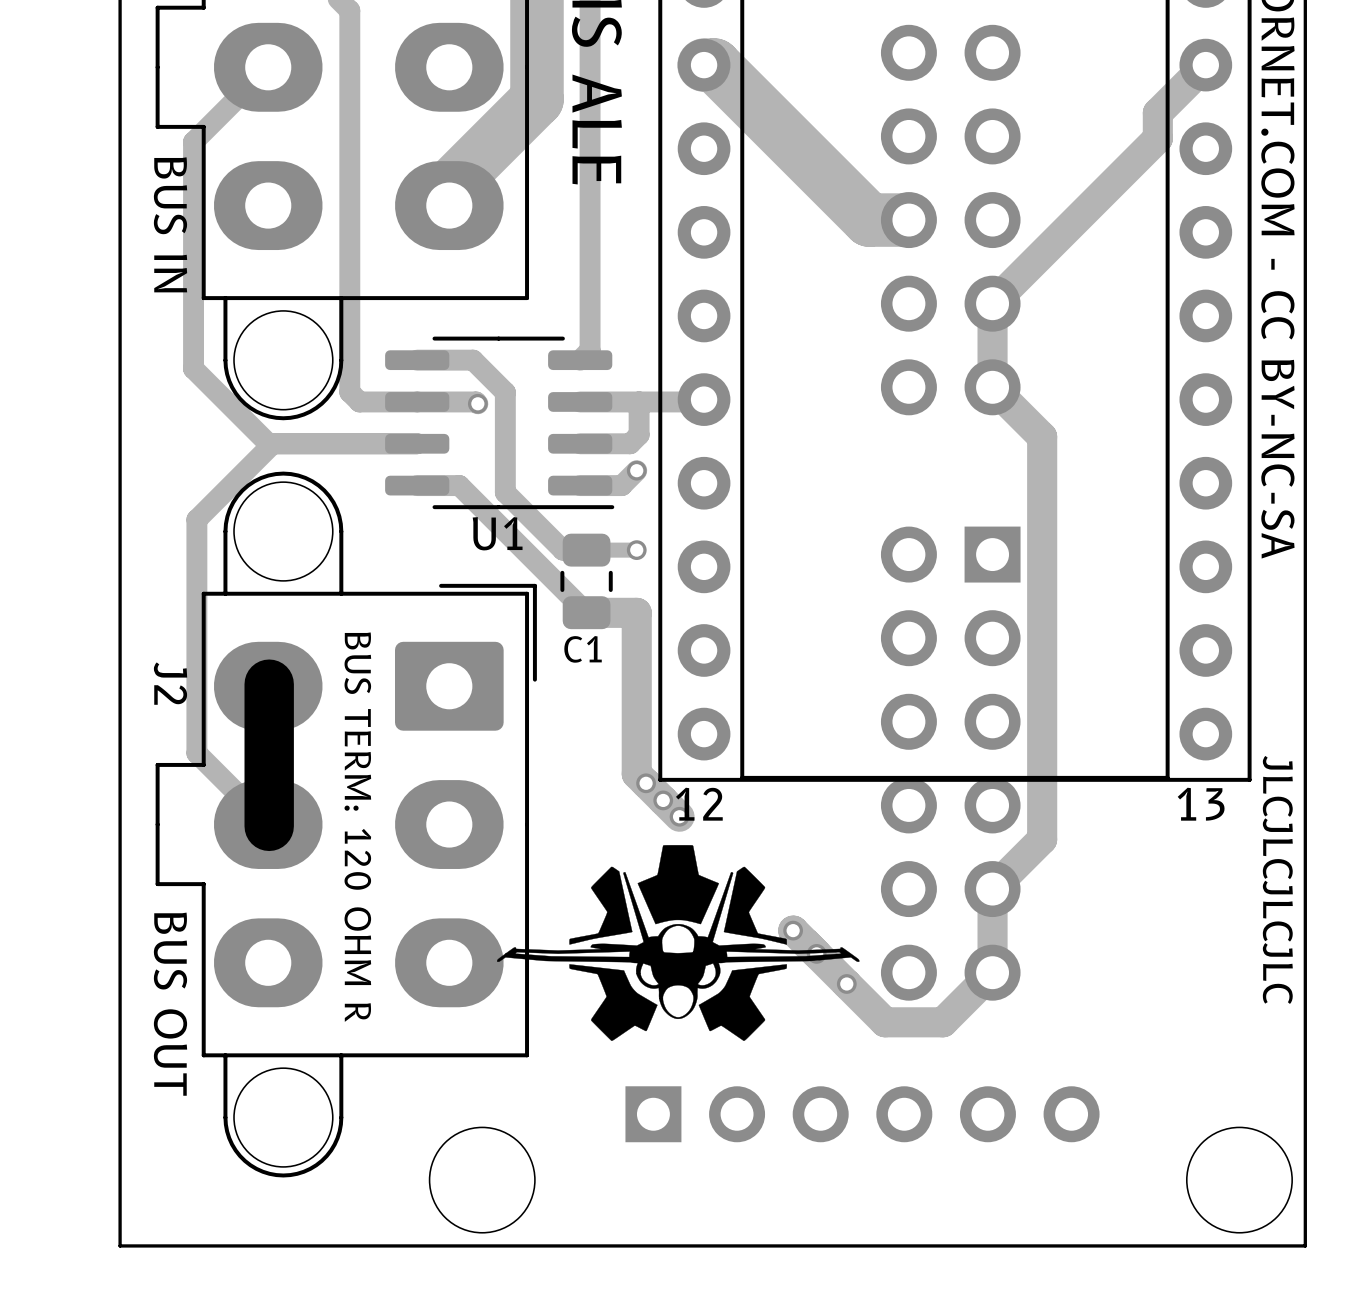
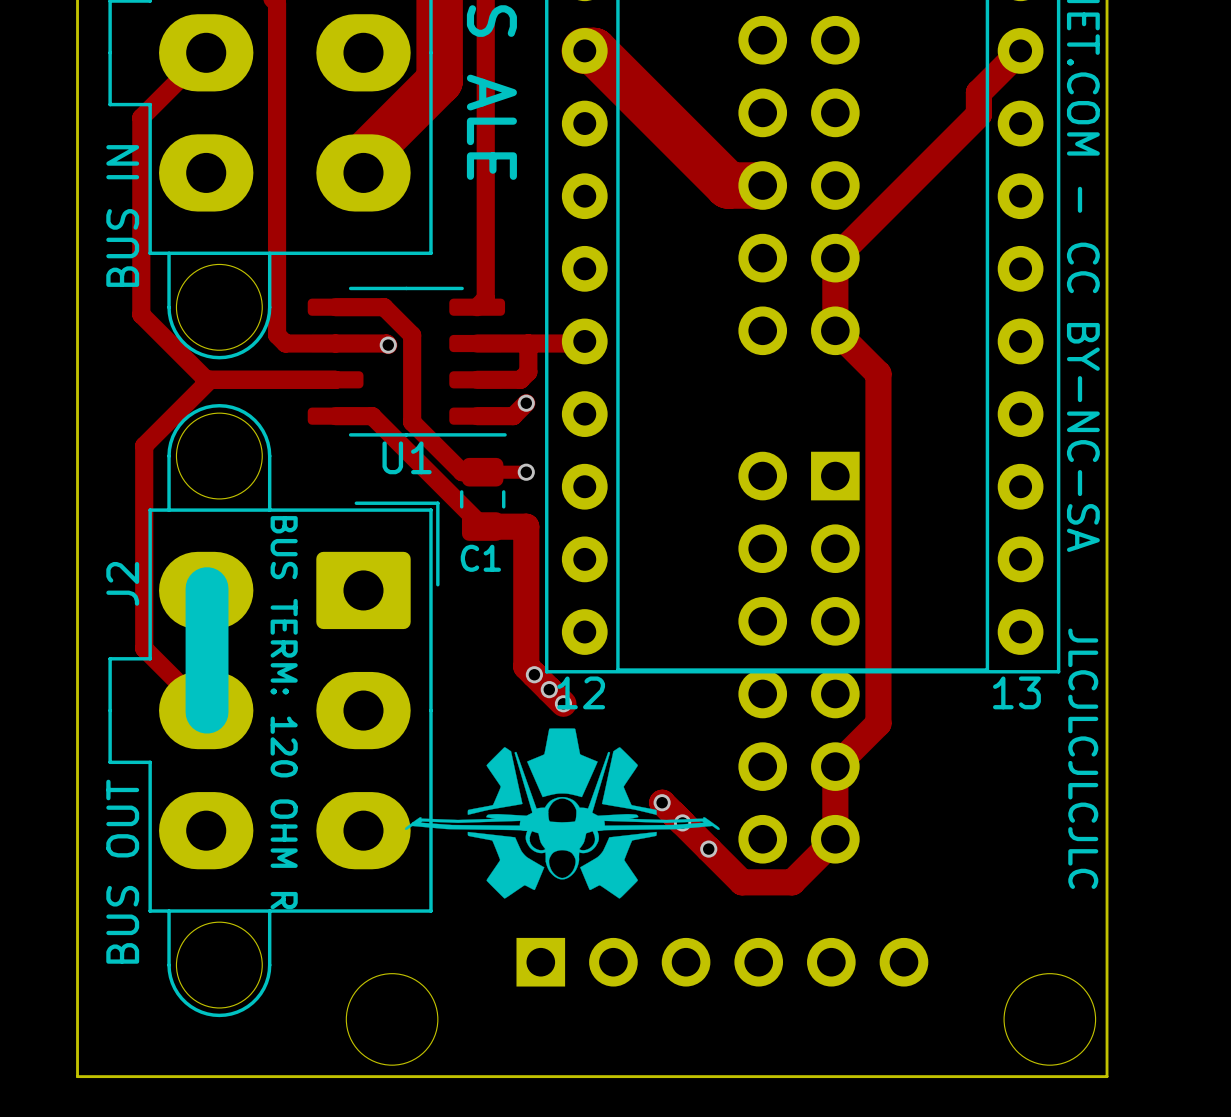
part value rotation: 0° (170, 224) -> 180° (122, 216)
J2 name rotation: 0° (170, 683) -> 180° (122, 583)
J2 value rotation: 0° (170, 1004) -> 180° (122, 871)

